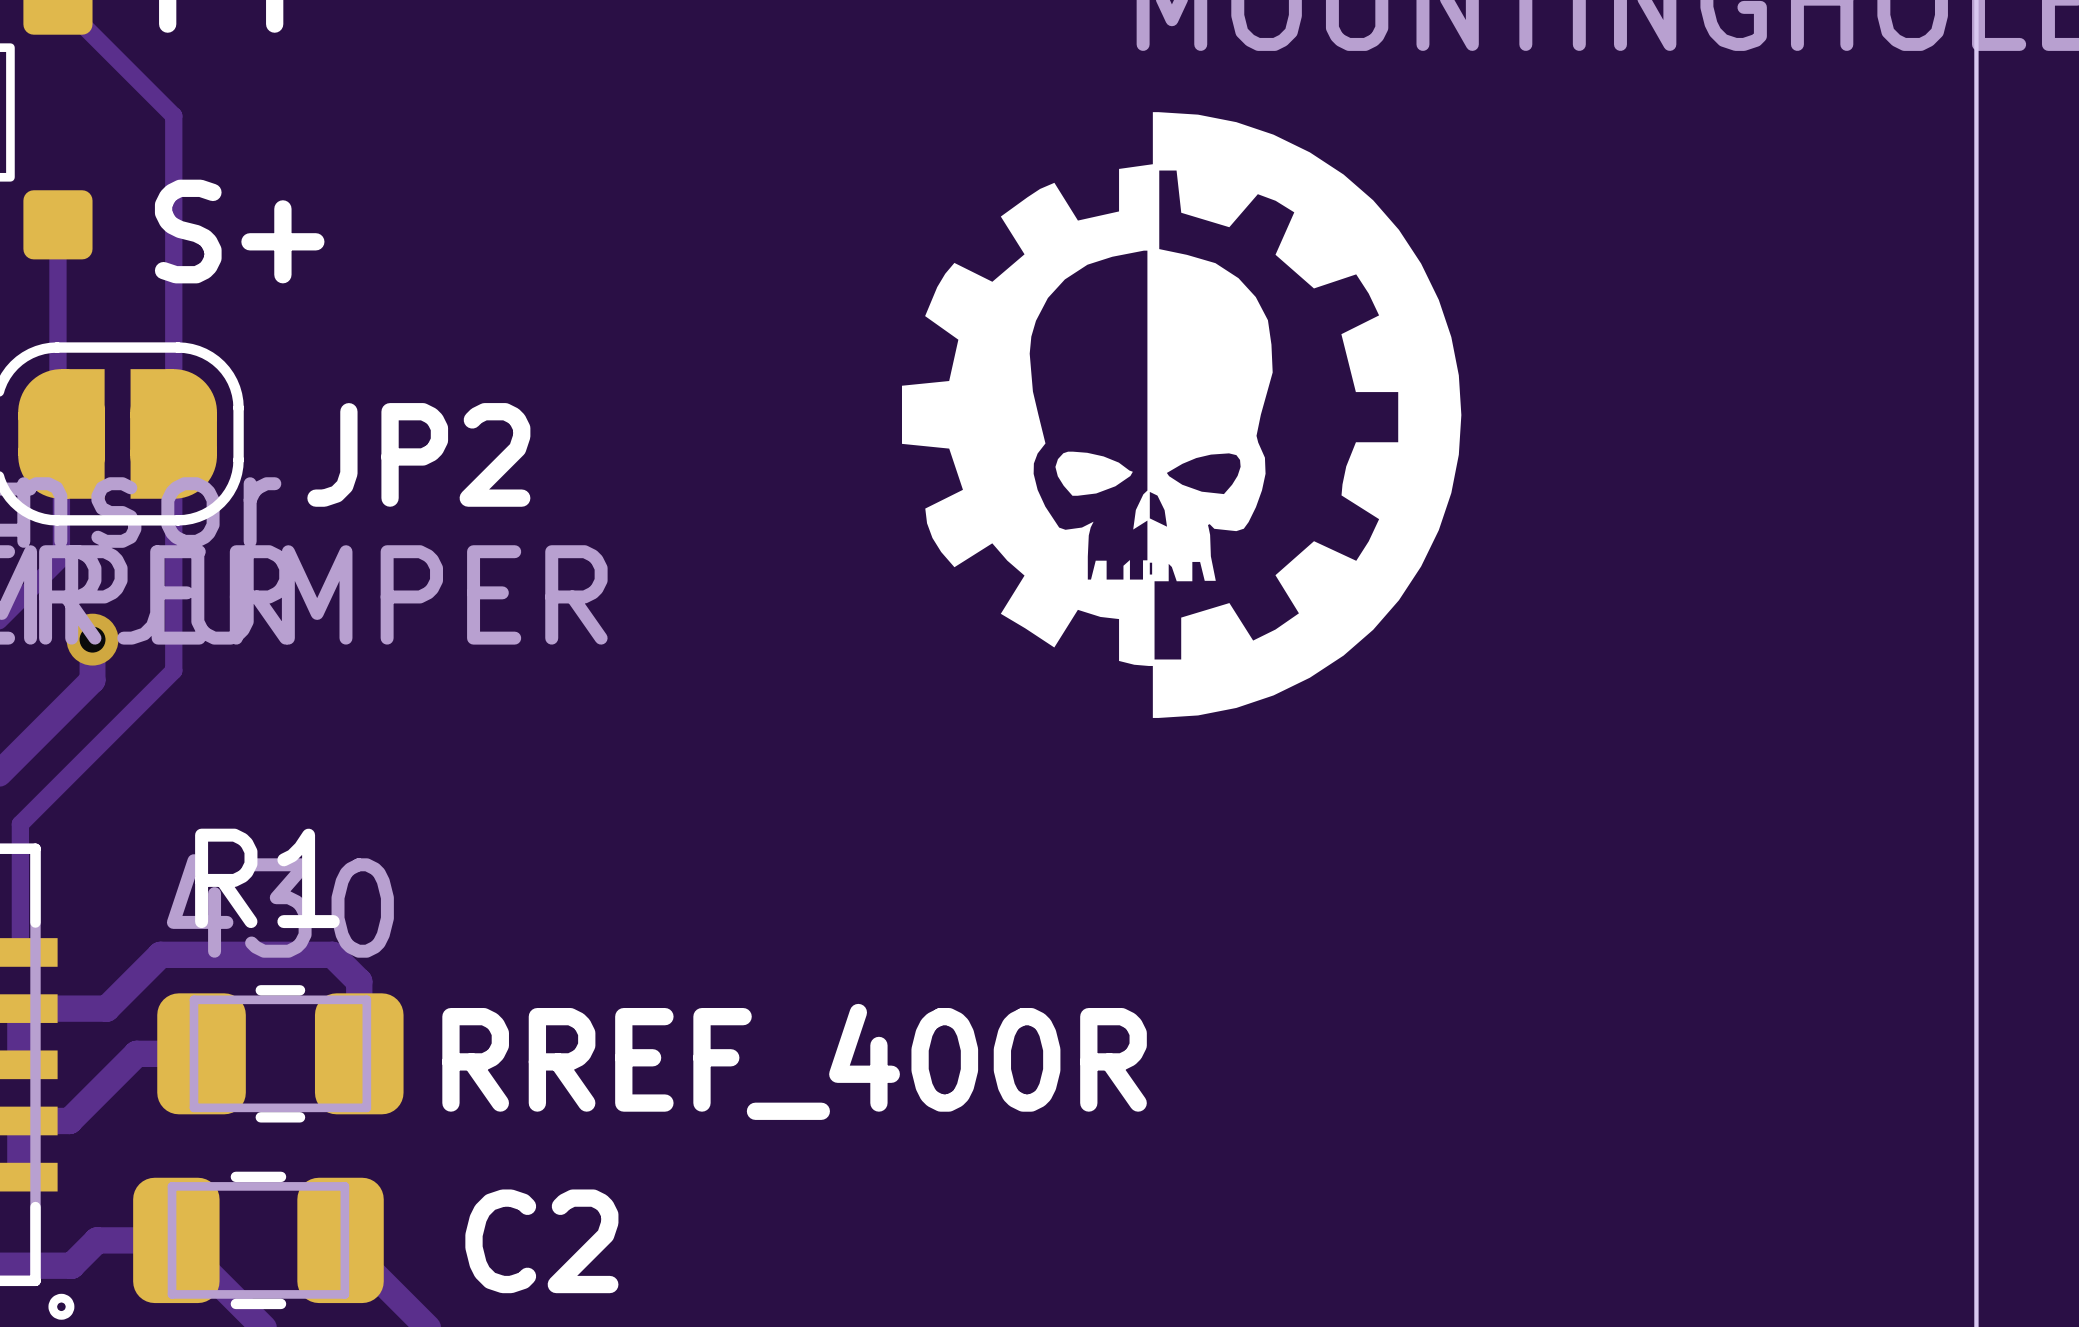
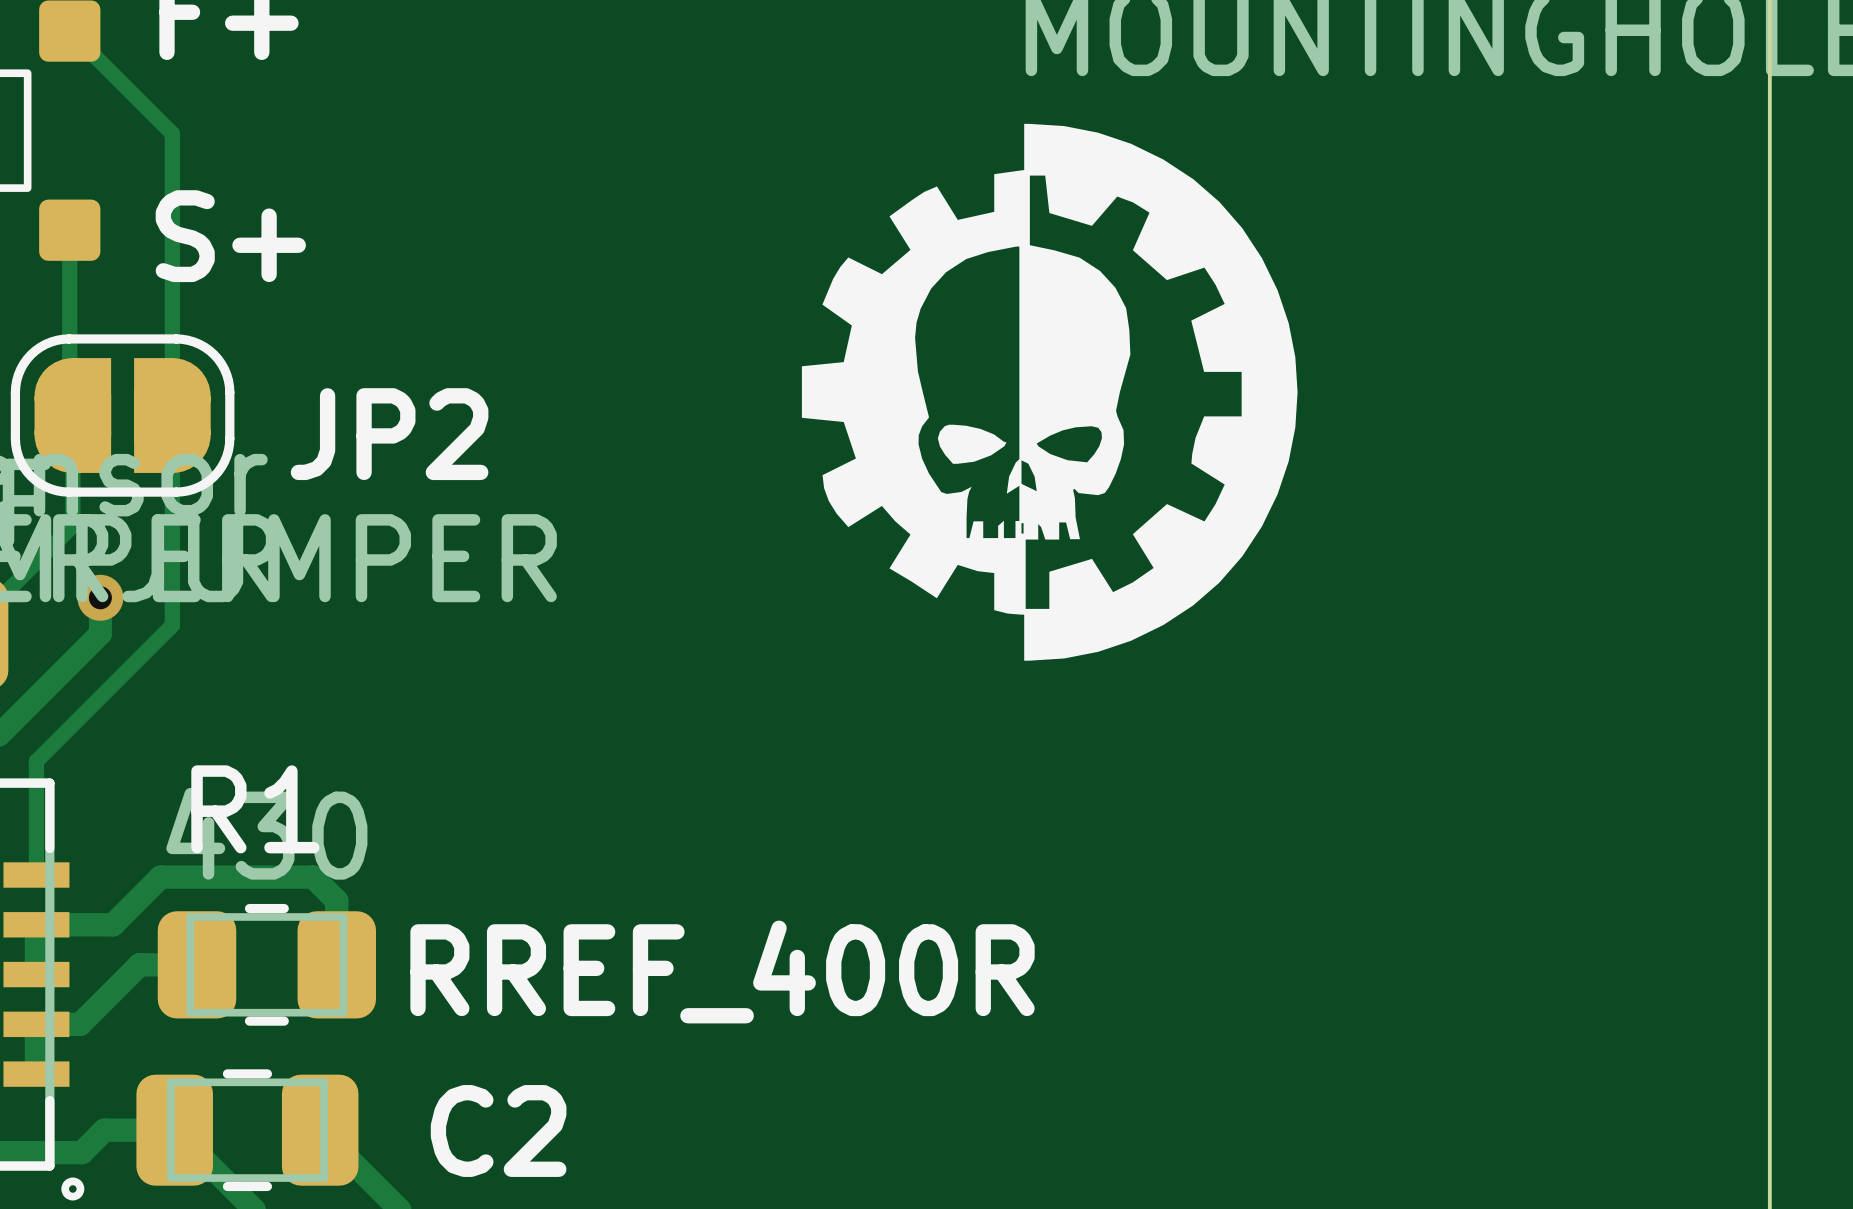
drawing position: (1181, 415) -> (1049, 392)
drawing position: (1094, 473) -> (972, 444)

